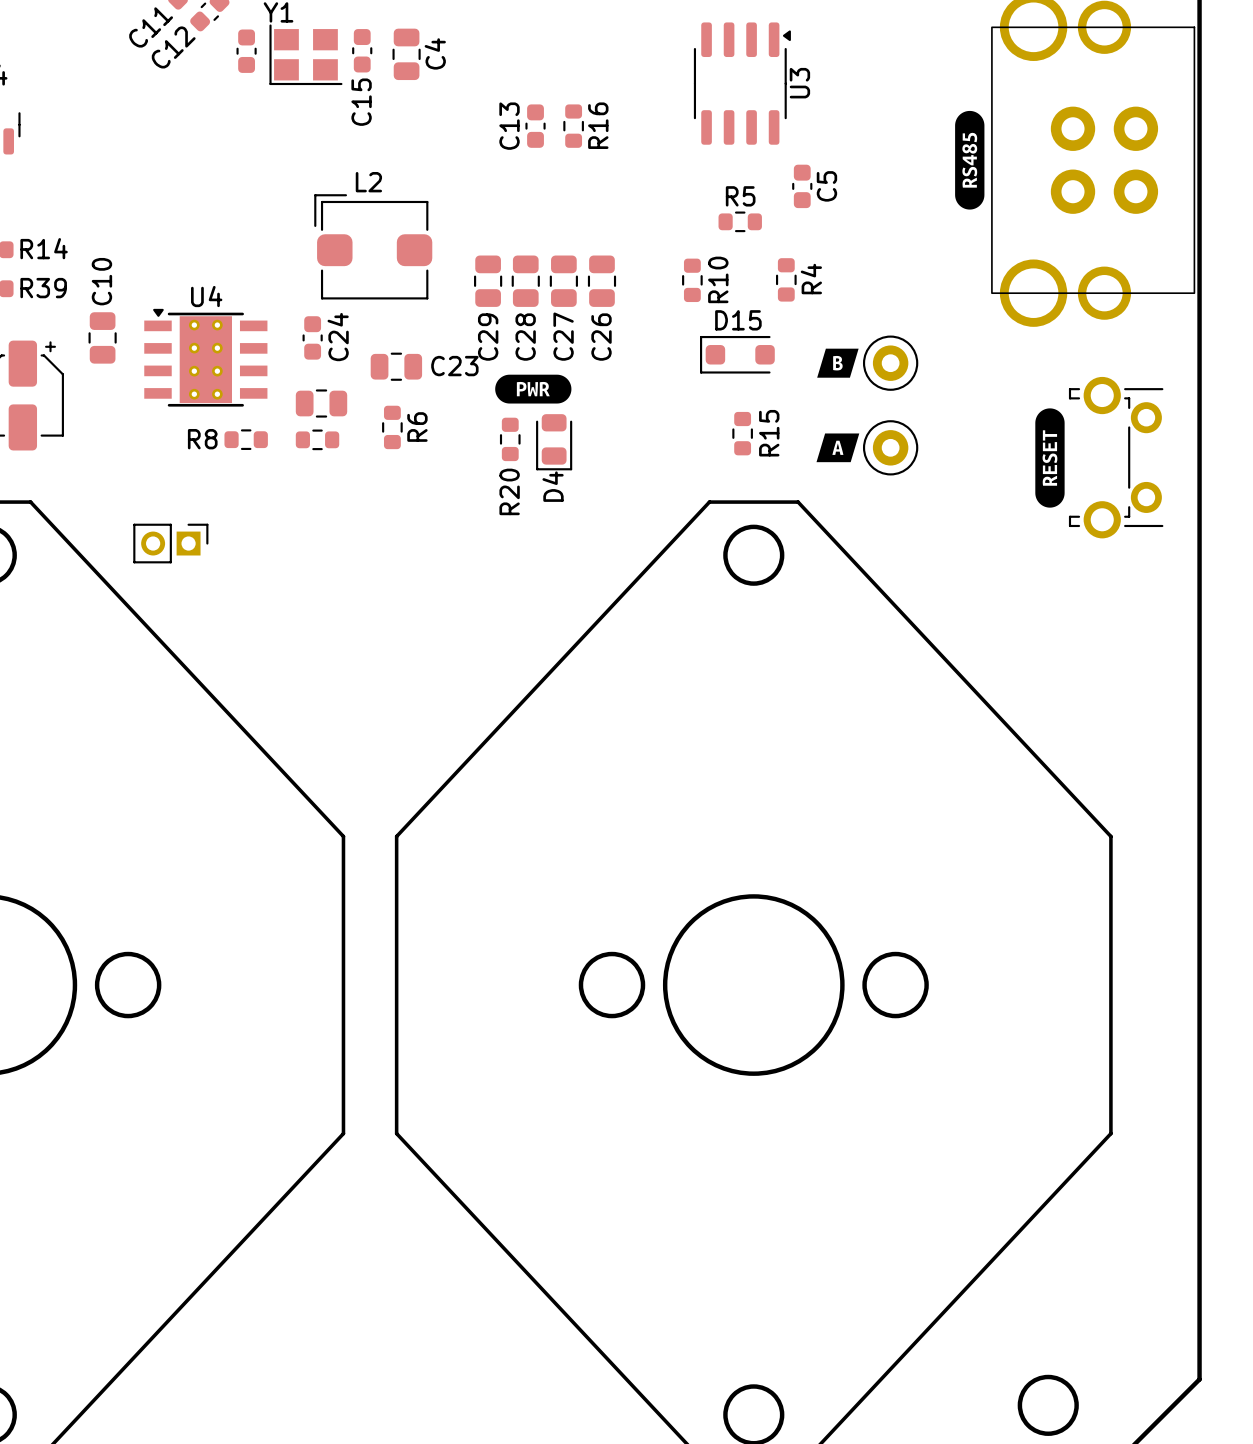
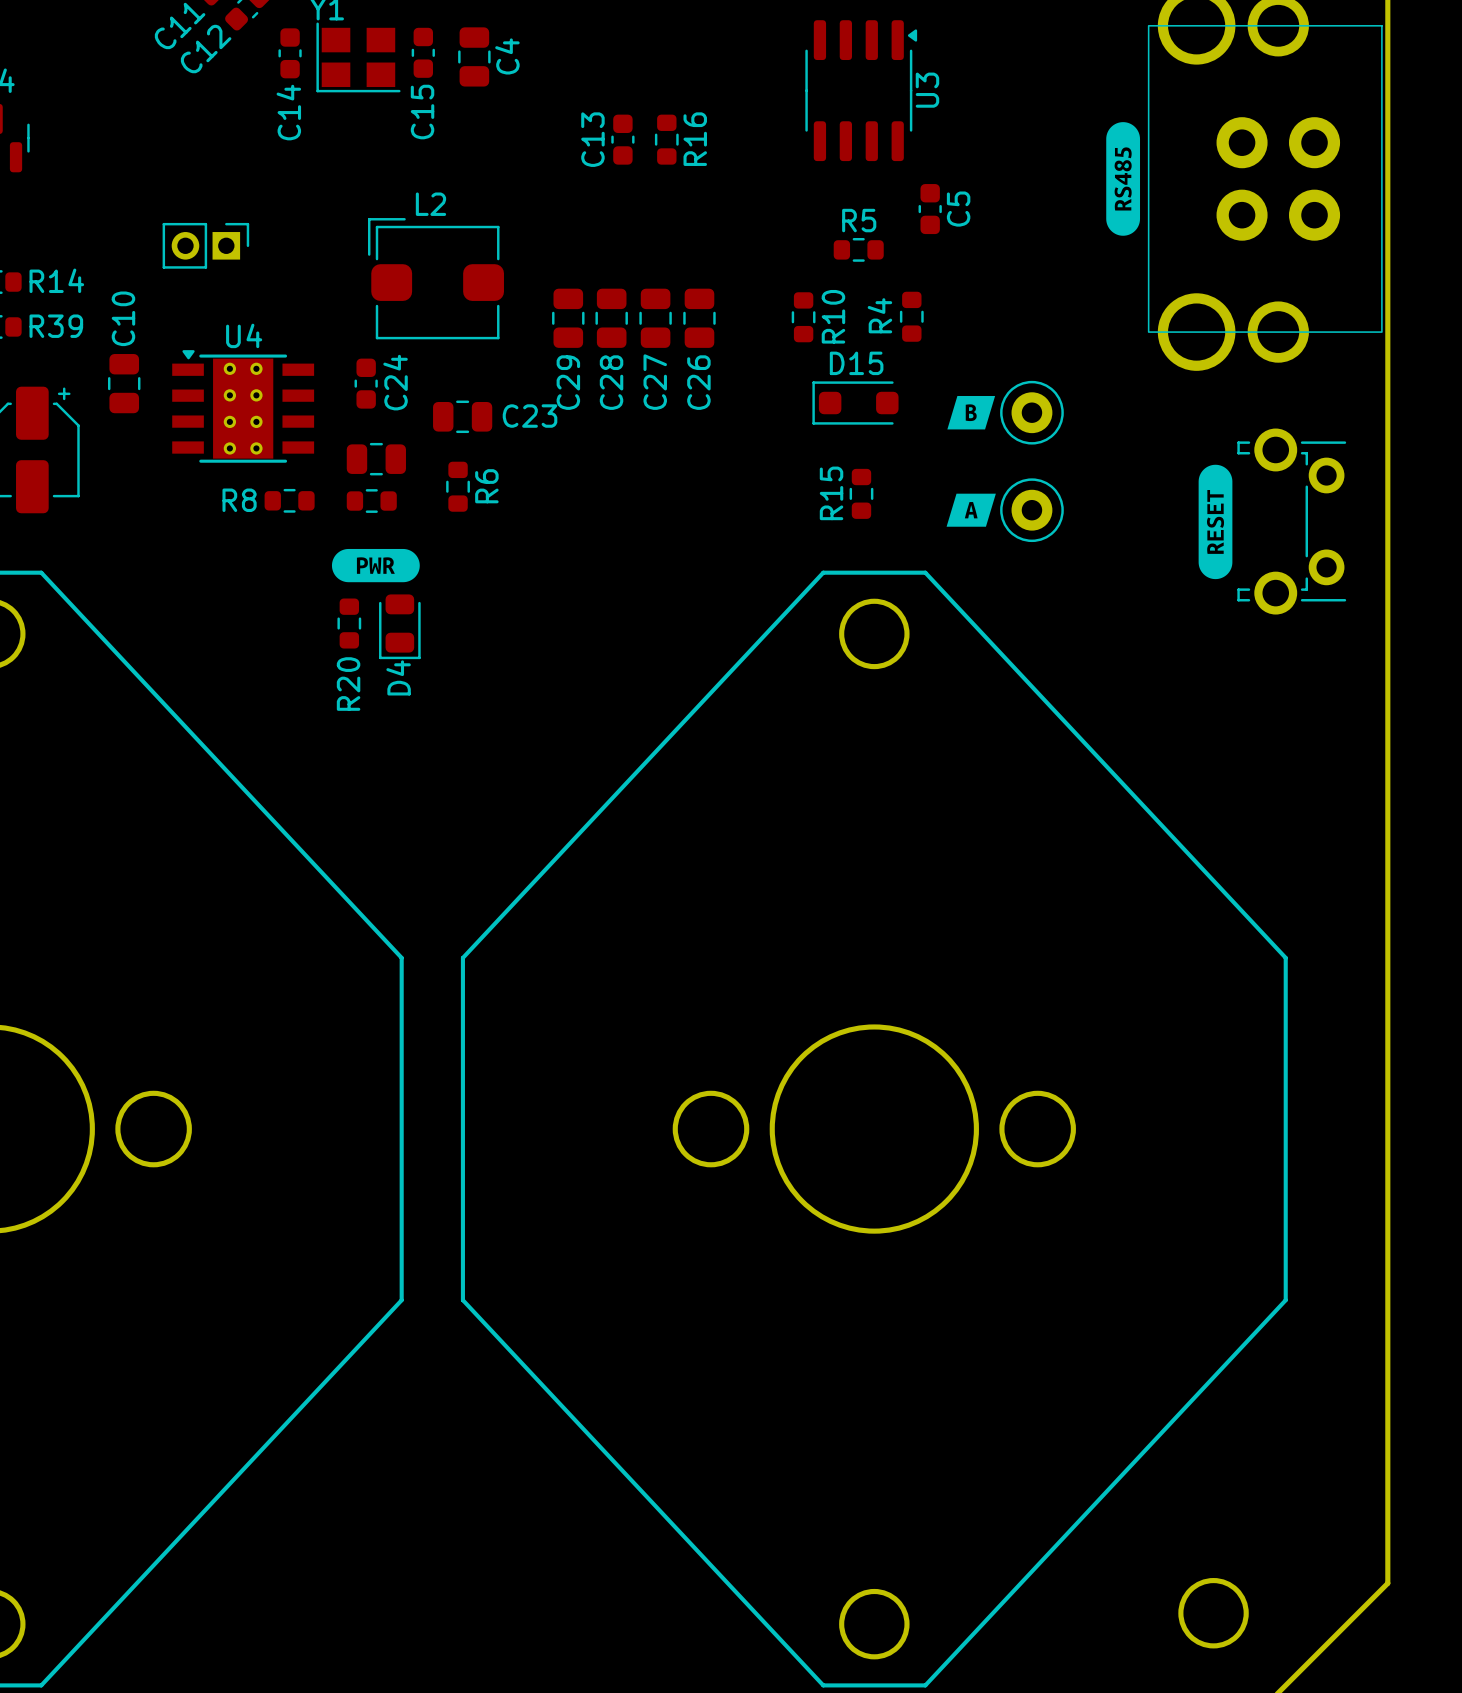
C14 name: none -> C14 (288, 112)
R4 name position: R4 (811, 279) -> R4 (879, 315)
drawing position: (533, 389) -> (375, 565)
R15 name position: R15 (769, 433) -> R15 (831, 493)
R20 position: (510, 439) -> (349, 623)
D4 position: (554, 442) -> (399, 626)
part position: (170, 543) -> (205, 245)

